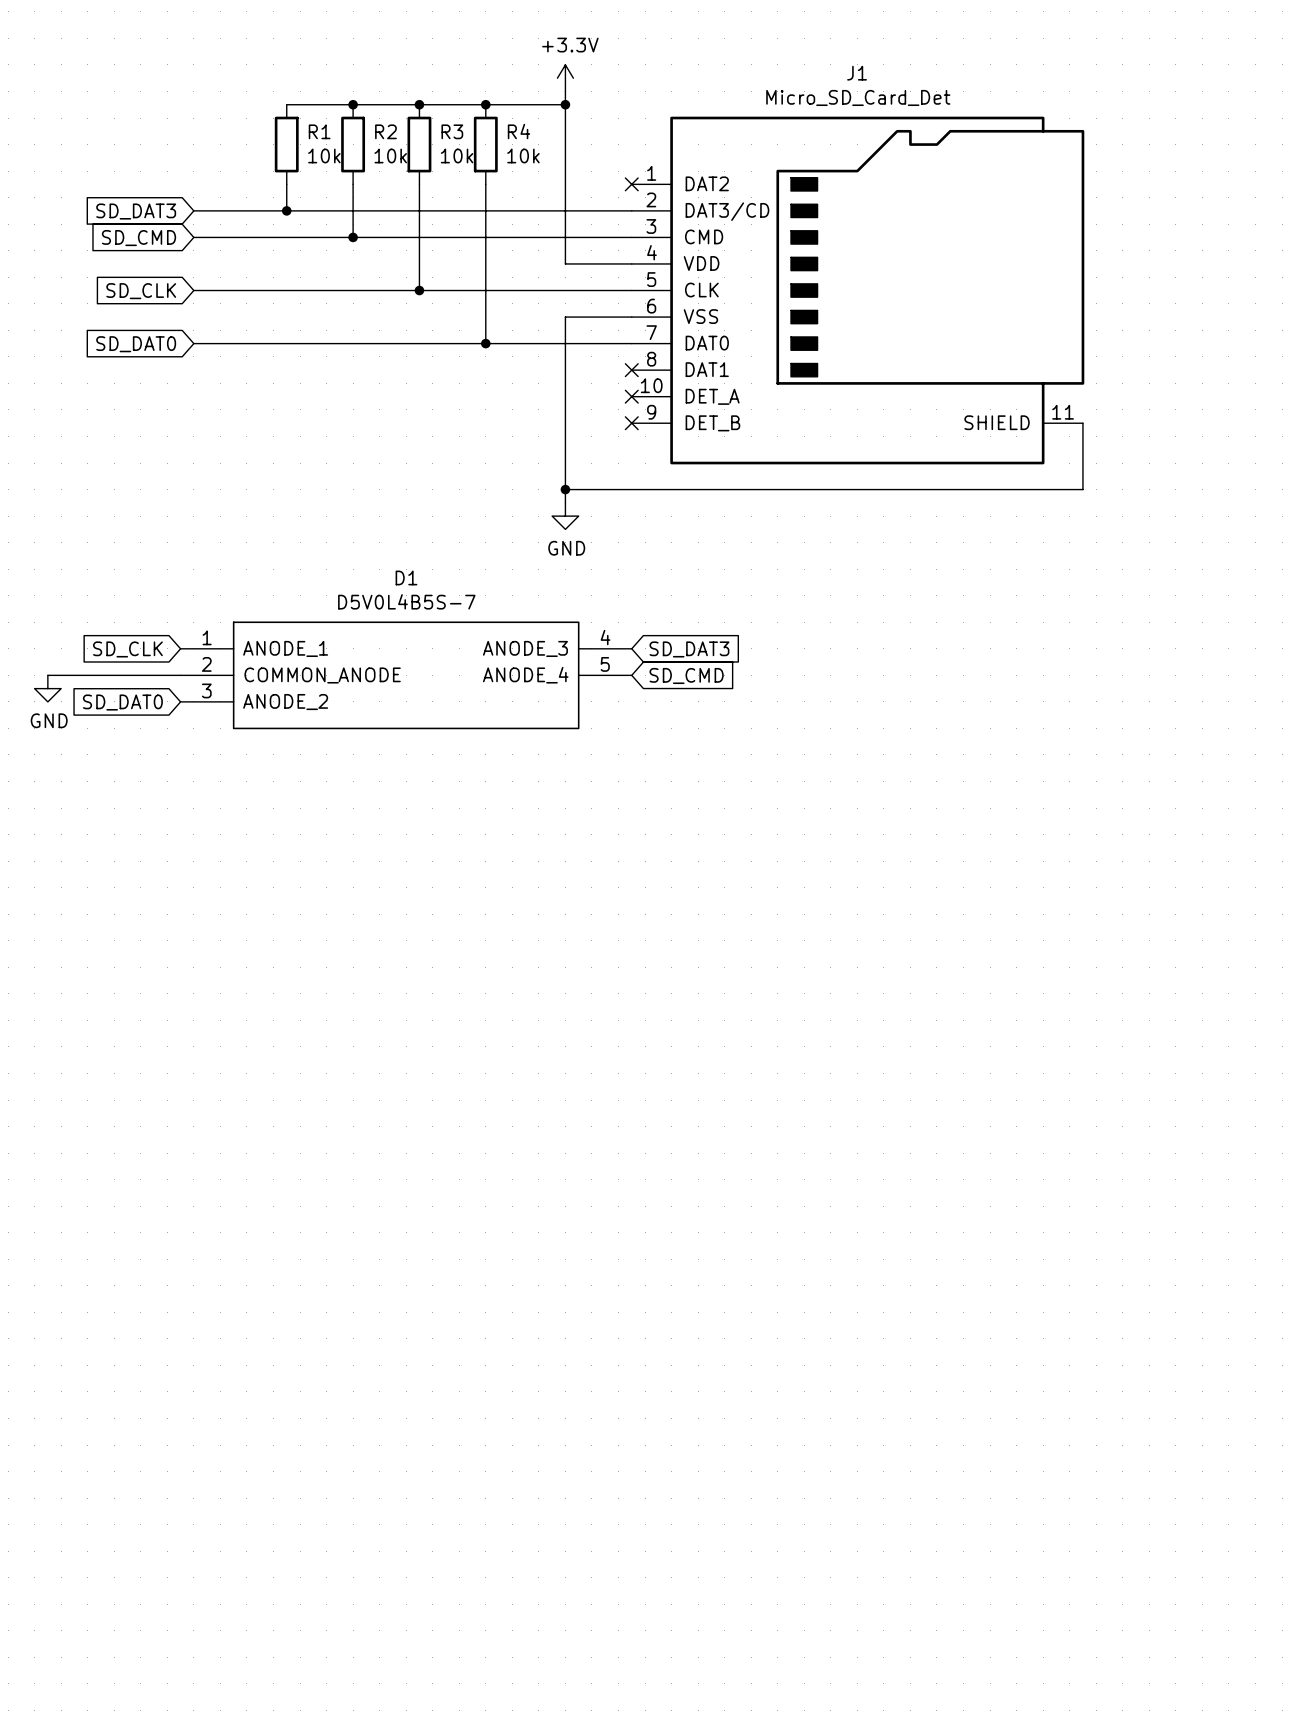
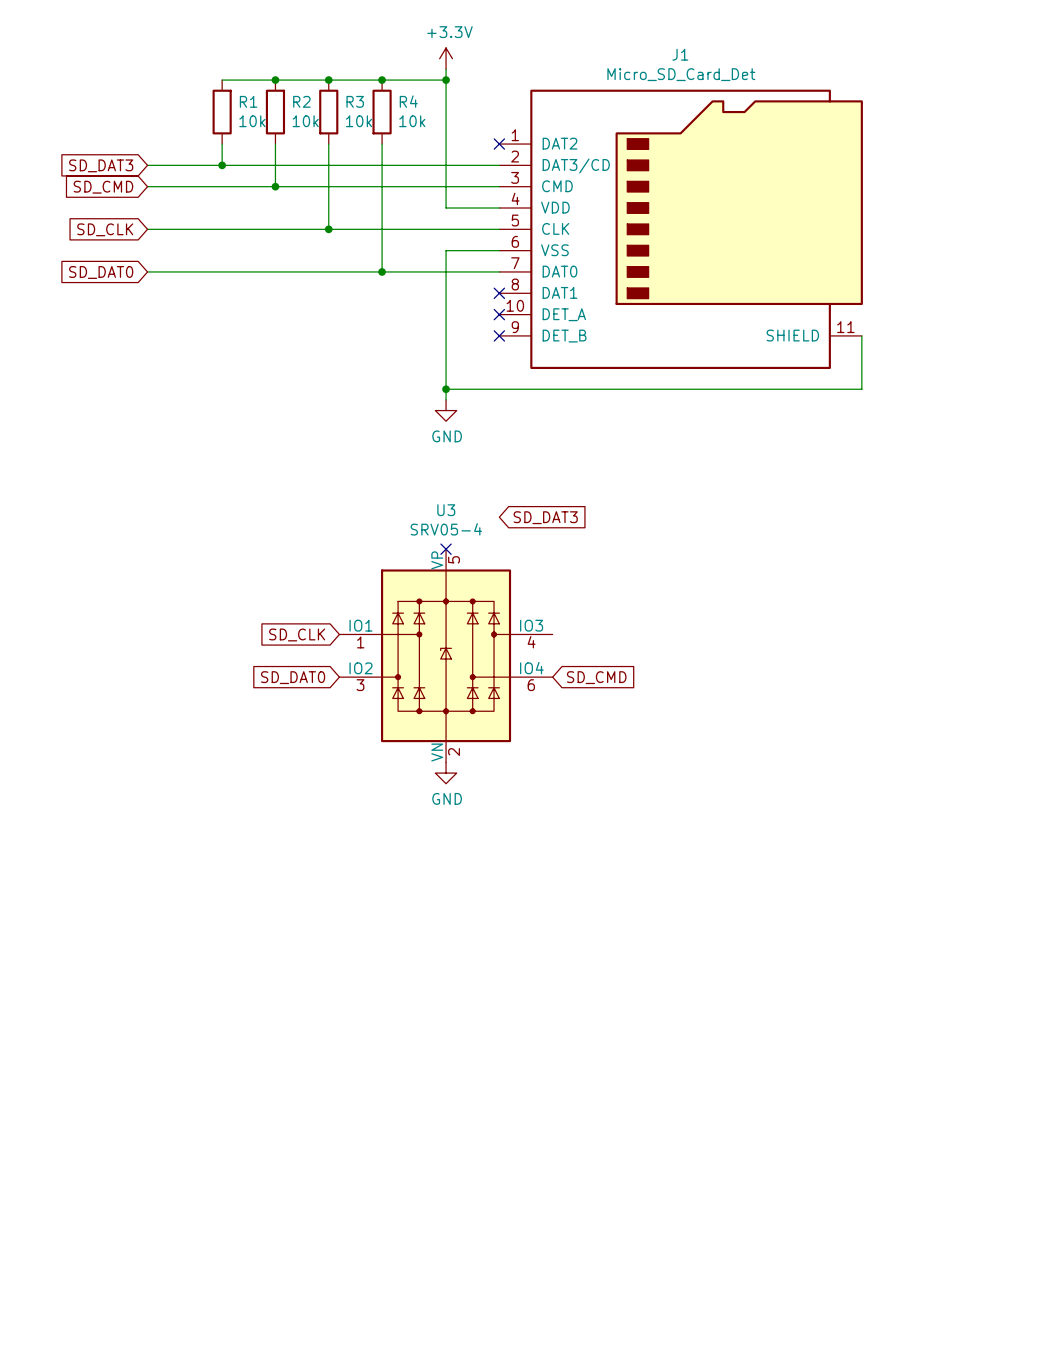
global label: SD_CLK (127, 649) -> none
wire: (47, 675) (180, 675) -> none
D1: D5V0L4B5S-7 (406, 675) -> none
global label position: SD_CMD (686, 675) -> SD_CMD (596, 677)
power symbol: GND (47, 688) -> none
no-connect mark: none -> (446, 549)
global label: SD_DAT0 (122, 702) -> none
global label: none -> SD_CLK (297, 634)
U3: none -> SRV05-4 (446, 655)
global label: none -> SD_DAT0 (293, 677)
power symbol: none -> GND (446, 773)

